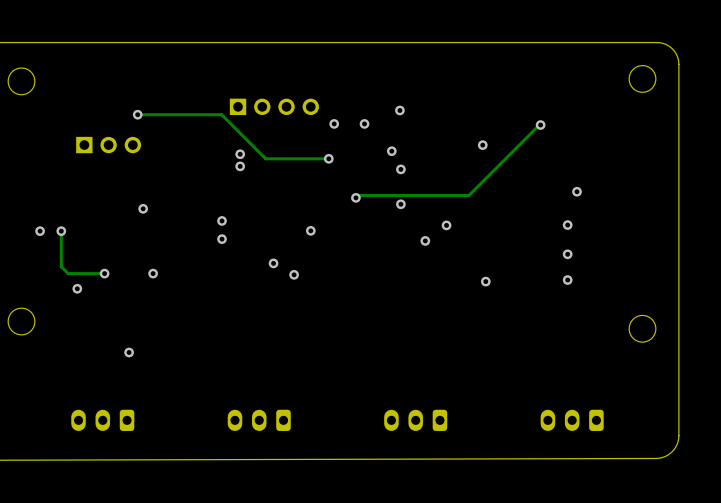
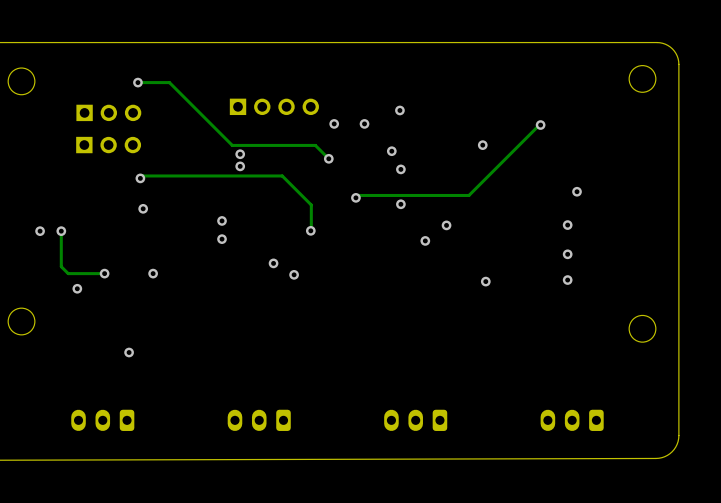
via: none -> (137, 82)
part: none -> (108, 112)
track: (137, 114) (221, 114) (265, 158) (328, 158) -> (137, 82) (169, 82) (232, 145) (315, 145) (328, 158)
via: (137, 114) -> none
track: none -> (140, 178) (142, 175) (282, 175) (311, 205) (311, 230)
via: none -> (140, 178)

